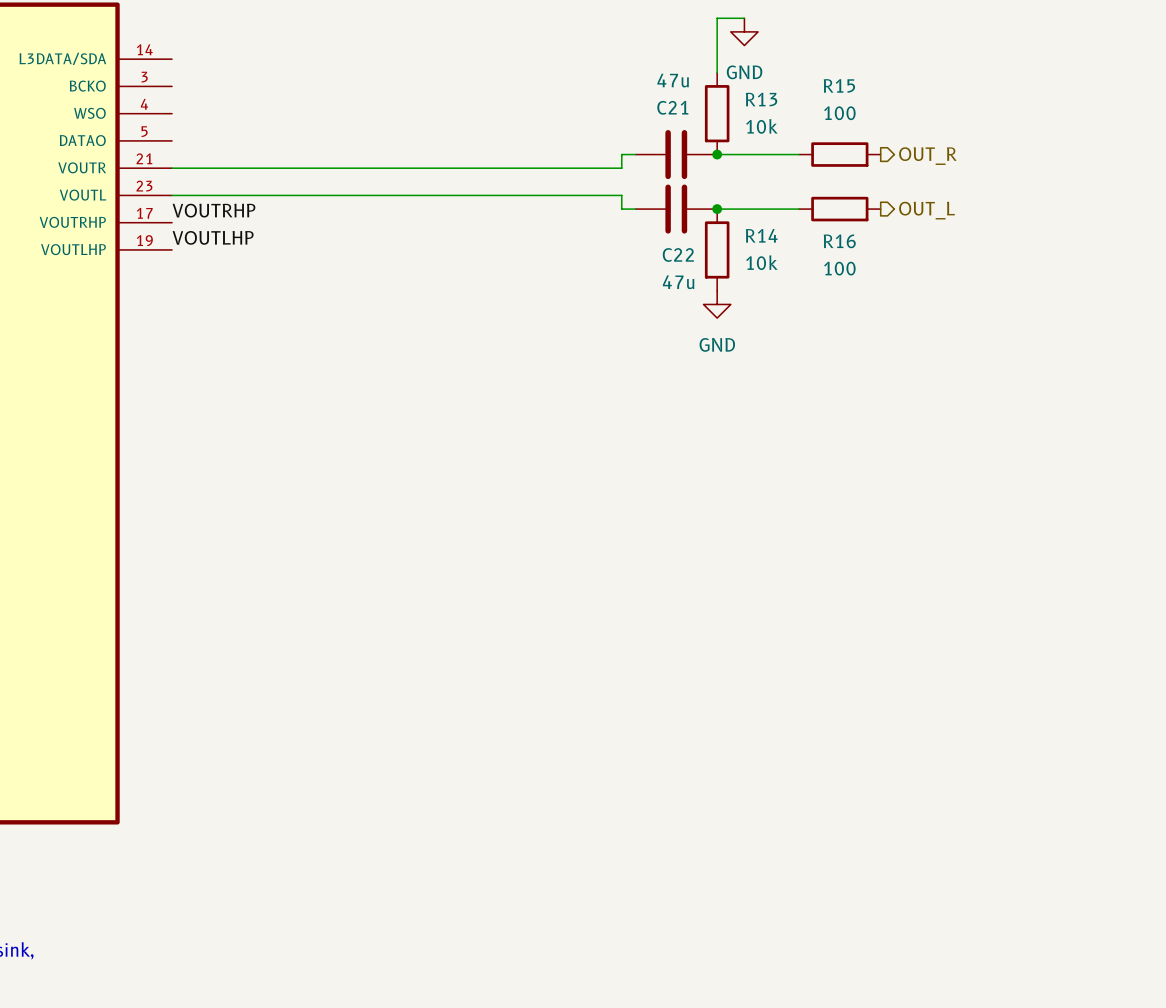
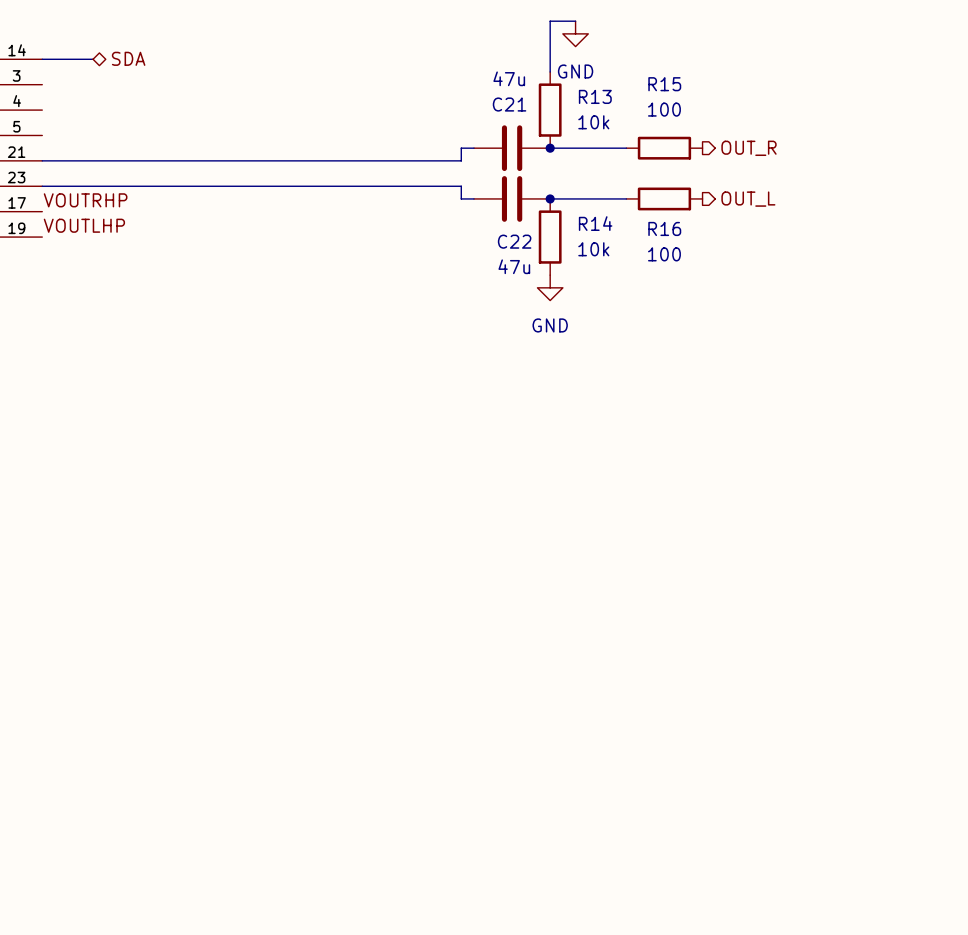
hierarchical label: none -> SDA (128, 58)
wire: none -> (42, 59) (93, 59)

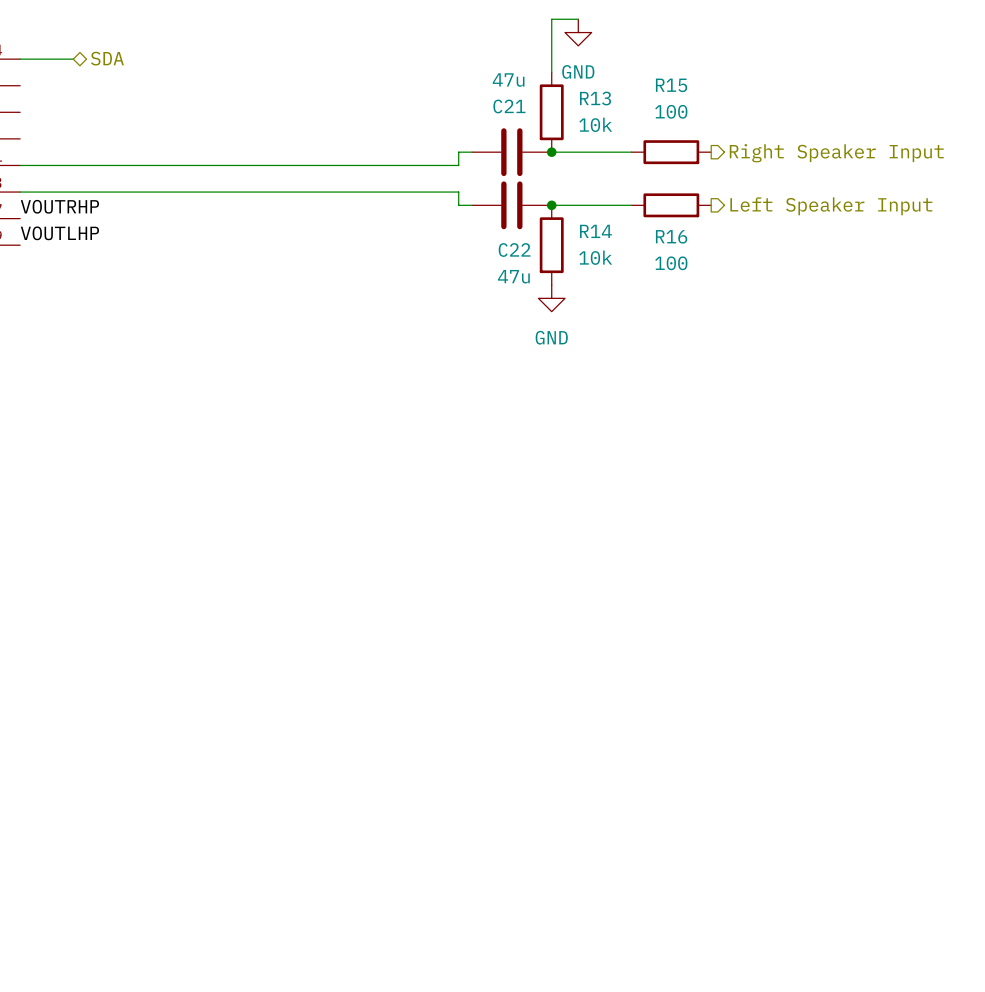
hierarchical label: OUT_R (749, 148) -> Right Speaker Input (836, 153)
hierarchical label: OUT_L (748, 199) -> Left Speaker Input (831, 206)

